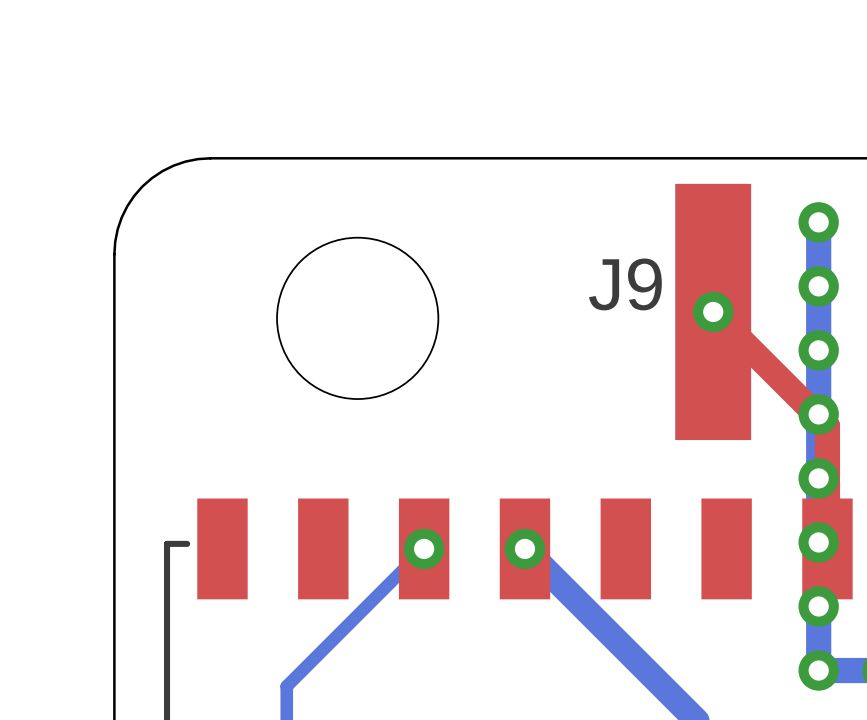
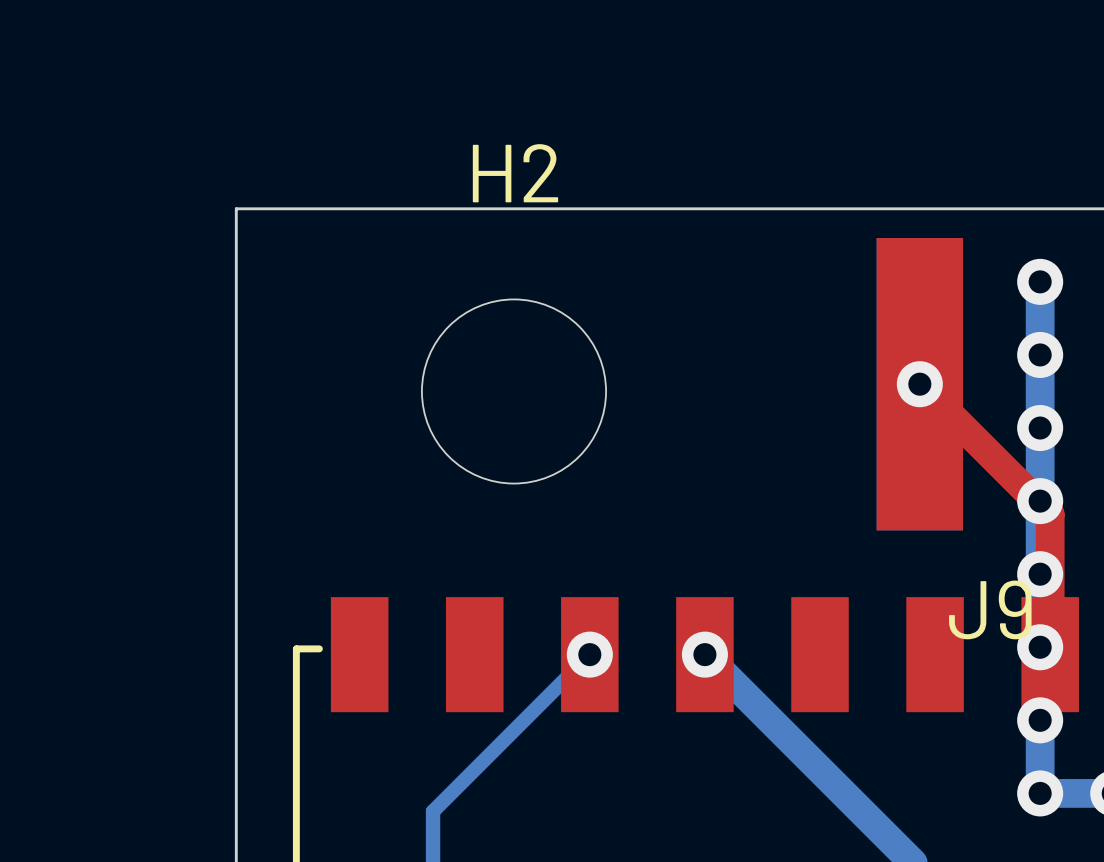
H2 name: none -> H2 (515, 173)
board edge: (210, 158) (197, 159) (173, 165) (151, 178) (142, 186) (127, 206) (121, 217) (115, 241) (114, 254) -> (345, 208) (236, 208) (236, 318)
J9 name position: J9 (625, 284) -> J9 (990, 609)

